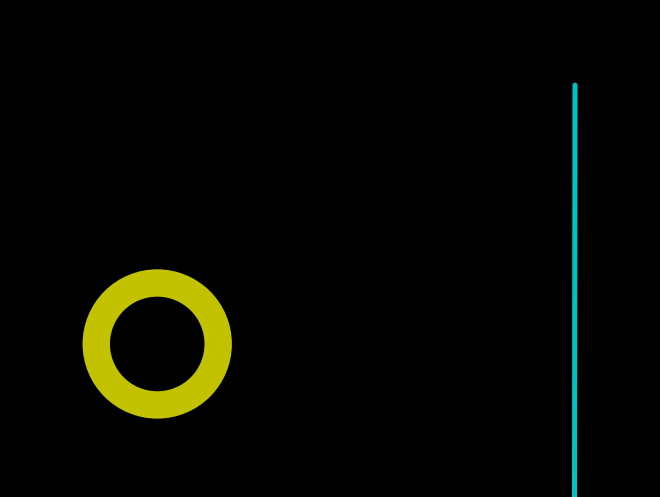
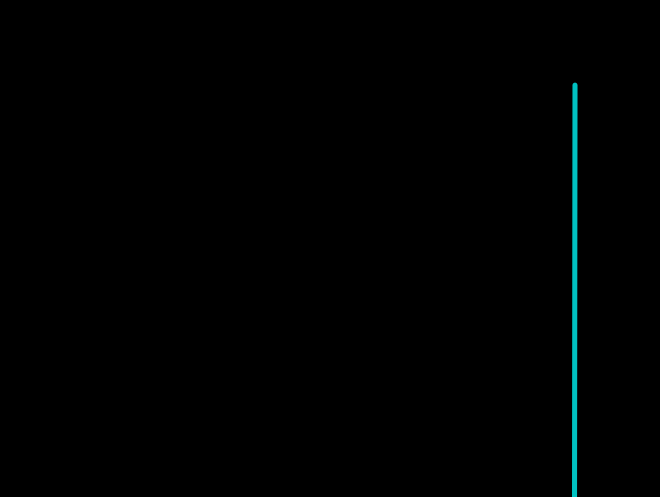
part: (157, 343) -> none

